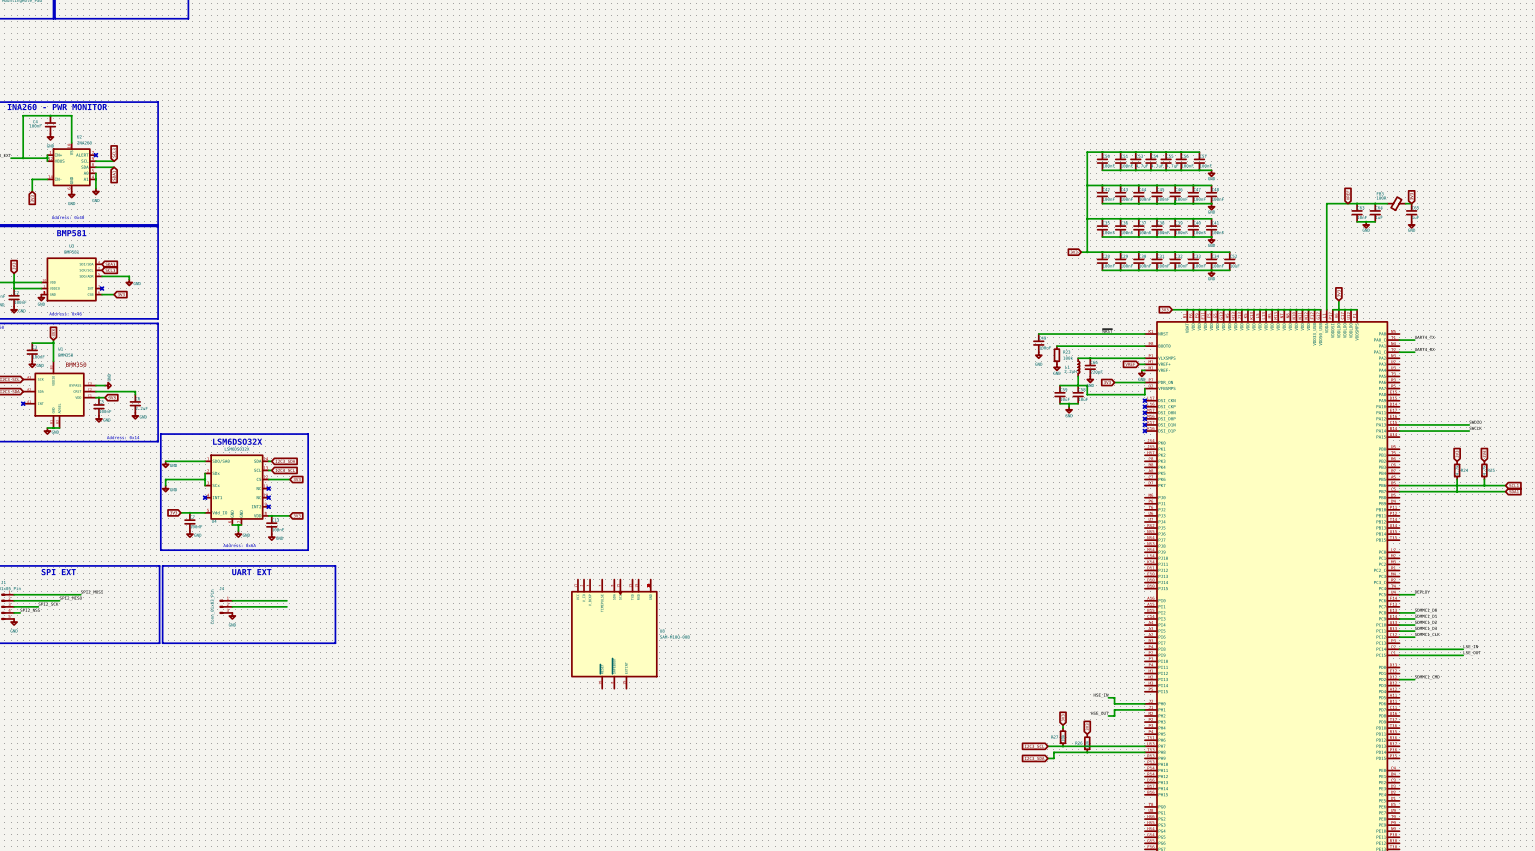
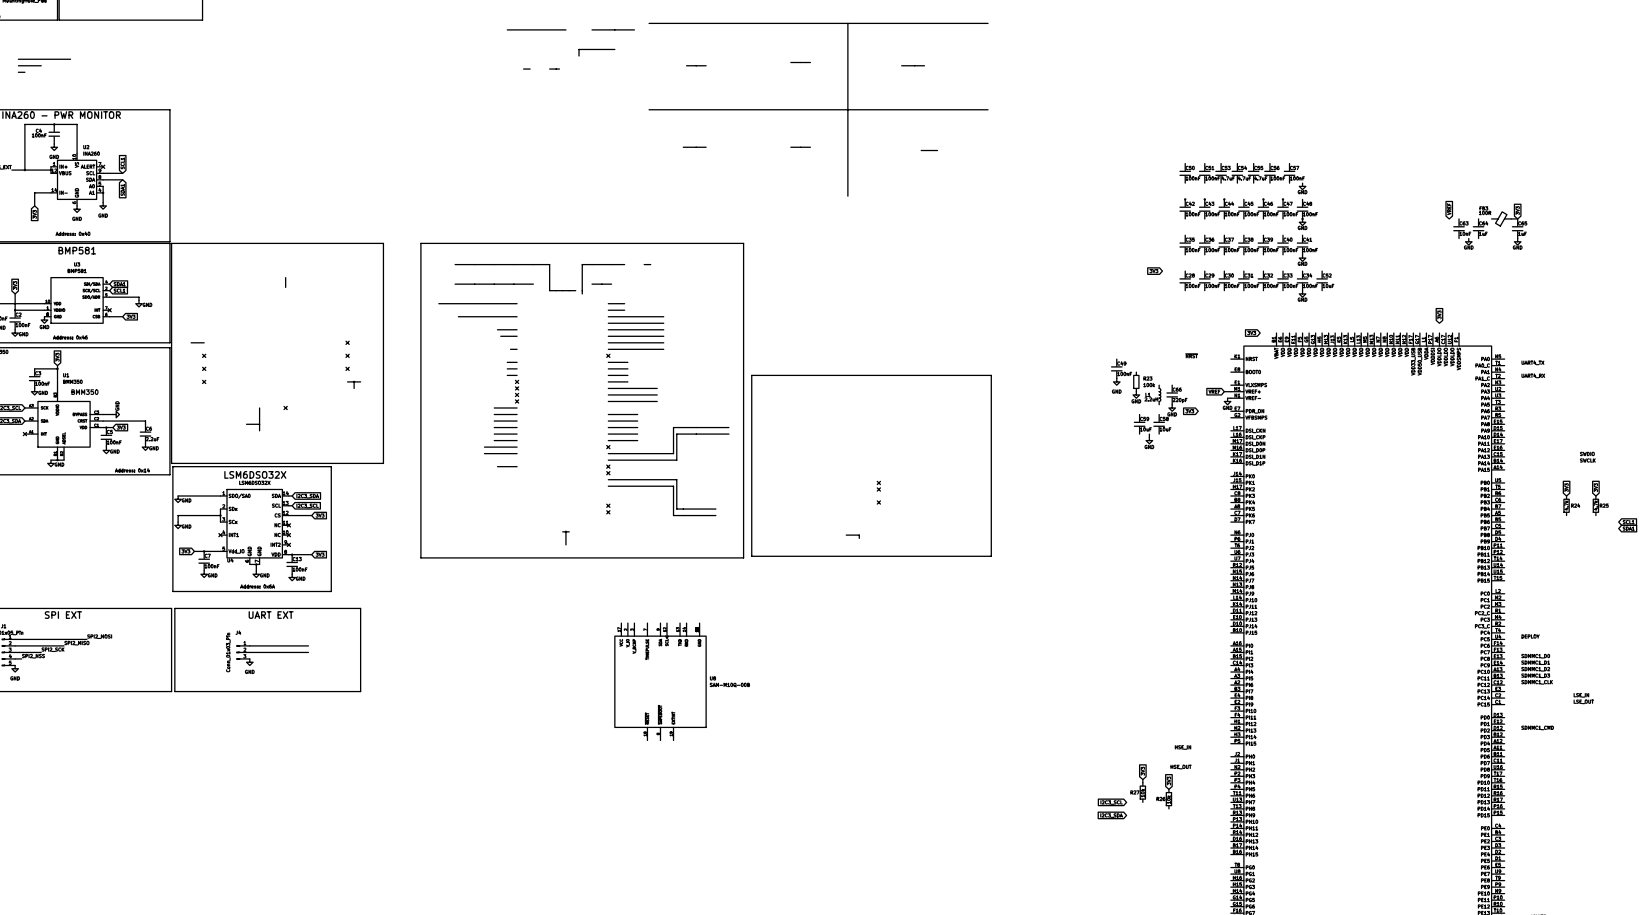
line: none -> (649, 23) (988, 23)
line: none -> (847, 23) (847, 196)
wire: none -> (507, 29) (565, 29)
wire: none -> (592, 29) (634, 29)
wire: none -> (614, 49) (579, 49) (579, 55)
wire: none -> (18, 59) (70, 59)
wire: none -> (790, 62) (810, 62)
wire: none -> (18, 65) (41, 65)
wire: none -> (686, 65) (706, 65)
wire: none -> (901, 65) (924, 65)
wire: none -> (523, 69) (530, 69)
wire: none -> (549, 69) (559, 69)
wire: none -> (18, 72) (24, 72)
line: none -> (649, 109) (988, 109)
wire: none -> (683, 147) (706, 147)
wire: none -> (790, 147) (810, 147)
wire: none -> (921, 150) (937, 150)
wire: (1199, 152) (1087, 152) (1087, 252) -> none
wire: (1102, 170) (1211, 170) -> none
wire: (1087, 185) (1211, 185) -> none
wire: (1102, 203) (1211, 203) -> none
wire: (1387, 203) (1326, 203) (1326, 309) -> none
wire: (1087, 218) (1211, 218) -> none
wire: (1357, 221) (1375, 221) -> none
line: none -> (171, 243) (171, 463) (383, 463) (383, 243) (171, 243)
line: none -> (420, 243) (743, 243) (743, 557) (420, 557) (420, 243)
wire: (1102, 237) (1211, 237) -> none
wire: none -> (455, 264) (549, 264) (549, 290) (575, 290)
wire: none -> (624, 264) (582, 264) (582, 293)
wire: none -> (644, 264) (650, 264)
wire: (1081, 252) (1229, 252) -> none
wire: none -> (285, 277) (285, 287)
wire: none -> (455, 284) (533, 284)
wire: none -> (592, 284) (611, 284)
wire: (1102, 270) (1229, 270) -> none
wire: none -> (438, 303) (517, 303)
wire: none -> (608, 303) (624, 303)
wire: none -> (608, 310) (624, 310)
wire: none -> (458, 316) (517, 316)
wire: none -> (608, 316) (663, 316)
wire: none -> (608, 323) (663, 323)
wire: (1338, 300) (1338, 309) -> none
wire: none -> (497, 329) (517, 329)
wire: none -> (608, 329) (663, 329)
wire: (1172, 309) (1320, 309) -> none
wire: (1332, 309) (1357, 309) -> none
wire: none -> (500, 336) (517, 336)
wire: none -> (608, 336) (663, 336)
wire: none -> (191, 342) (204, 342)
no-connect mark: none -> (347, 342)
wire: none -> (608, 342) (663, 342)
wire: none -> (510, 349) (517, 349)
wire: none -> (608, 349) (663, 349)
no-connect mark: none -> (204, 355)
no-connect mark: none -> (347, 355)
no-connect mark: none -> (608, 355)
wire: (1038, 334) (1144, 334) -> none
wire: none -> (507, 362) (517, 362)
wire: none -> (608, 362) (627, 362)
wire: (1399, 340) (1414, 340) -> none
no-connect mark: none -> (204, 368)
no-connect mark: none -> (347, 368)
wire: none -> (507, 368) (517, 368)
wire: none -> (608, 368) (627, 368)
wire: (1056, 346) (1144, 346) -> none
wire: none -> (507, 375) (517, 375)
wire: none -> (608, 375) (627, 375)
line: none -> (751, 375) (991, 375) (991, 556) (751, 556) (751, 375)
wire: (1399, 352) (1414, 352) -> none
no-connect mark: none -> (204, 381)
wire: none -> (347, 381) (360, 381)
wire: none -> (354, 381) (354, 388)
no-connect mark: none -> (517, 381)
wire: none -> (608, 381) (627, 381)
wire: (1078, 358) (1144, 358) -> none
no-connect mark: none -> (517, 388)
wire: none -> (608, 388) (657, 388)
no-connect mark: none -> (517, 394)
wire: none -> (608, 394) (657, 394)
no-connect mark: none -> (517, 401)
wire: none -> (608, 401) (657, 401)
wire: (1078, 376) (1078, 385) -> none
wire: none -> (259, 407) (259, 430)
no-connect mark: none -> (285, 407)
wire: none -> (494, 407) (517, 407)
wire: (1114, 382) (1144, 382) -> none
wire: none -> (494, 414) (517, 414)
wire: none -> (608, 414) (637, 414)
wire: (1059, 385) (1087, 385) (1087, 394) (1144, 394) (1144, 388) -> none
wire: none -> (494, 421) (517, 421)
wire: none -> (608, 421) (637, 421)
wire: none -> (246, 424) (259, 424)
wire: none -> (494, 427) (517, 427)
wire: none -> (608, 427) (637, 427)
wire: none -> (728, 427) (673, 427) (673, 453) (608, 453)
no-connect mark: (1144, 400) -> none
wire: none -> (494, 434) (517, 434)
wire: none -> (608, 434) (637, 434)
wire: none -> (728, 434) (676, 434) (676, 460) (608, 460)
wire: (1059, 403) (1078, 403) -> none
no-connect mark: (1144, 406) -> none
wire: none -> (494, 440) (517, 440)
wire: none -> (608, 440) (637, 440)
no-connect mark: (1144, 412) -> none
wire: none -> (484, 447) (517, 447)
no-connect mark: none -> (608, 447)
no-connect mark: (1144, 418) -> none
wire: none -> (484, 453) (517, 453)
no-connect mark: (1144, 424) -> none
wire: (1399, 424) (1469, 424) -> none
no-connect mark: (1144, 431) -> none
wire: (1399, 431) (1469, 431) -> none
wire: none -> (497, 466) (517, 466)
no-connect mark: none -> (608, 466)
no-connect mark: none -> (608, 473)
wire: none -> (608, 479) (676, 479) (676, 509) (715, 509)
no-connect mark: none -> (878, 482)
wire: none -> (608, 486) (673, 486) (673, 515) (715, 515)
no-connect mark: none -> (878, 489)
no-connect mark: none -> (878, 502)
no-connect mark: none -> (608, 505)
no-connect mark: none -> (608, 512)
wire: (1457, 479) (1457, 491) -> none
wire: (1484, 479) (1484, 485) -> none
wire: (1399, 485) (1505, 485) -> none
wire: (1399, 491) (1505, 491) -> none
wire: none -> (562, 531) (569, 531)
wire: none -> (565, 531) (565, 544)
wire: none -> (846, 535) (859, 535) (859, 538)
wire: (1399, 594) (1414, 594) -> none
wire: (1399, 612) (1414, 612) -> none
wire: (1399, 618) (1414, 618) -> none
wire: (1399, 625) (1414, 625) -> none
wire: (1399, 631) (1414, 631) -> none
wire: (1399, 637) (1414, 637) -> none
wire: (1399, 649) (1463, 649) -> none
wire: (1399, 655) (1463, 655) -> none
wire: (1399, 679) (1414, 679) -> none
wire: (1108, 697) (1114, 697) (1114, 703) (1144, 703) -> none
wire: (1144, 709) (1114, 709) (1114, 716) (1108, 716) -> none
wire: (1047, 746) (1144, 746) -> none
wire: (1144, 752) (1053, 752) (1053, 758) (1047, 758) -> none

